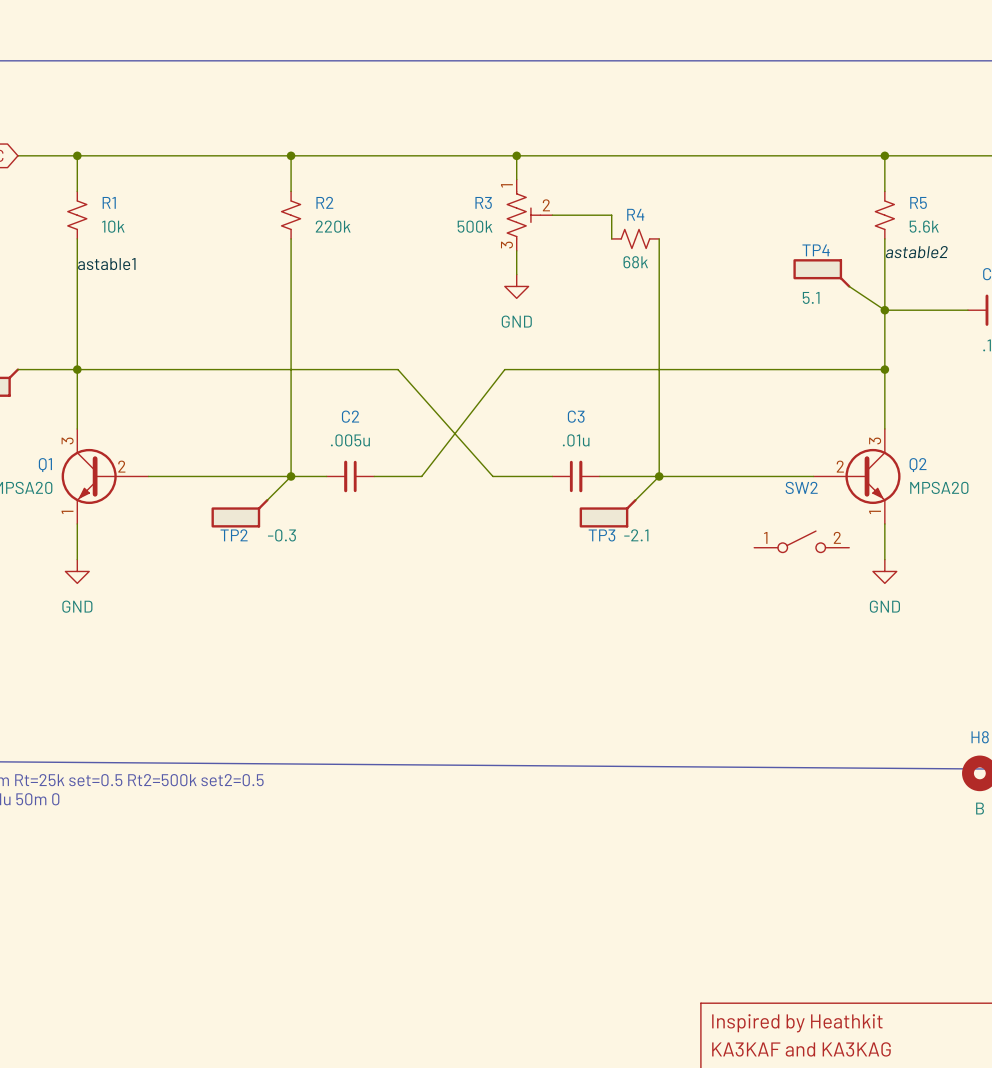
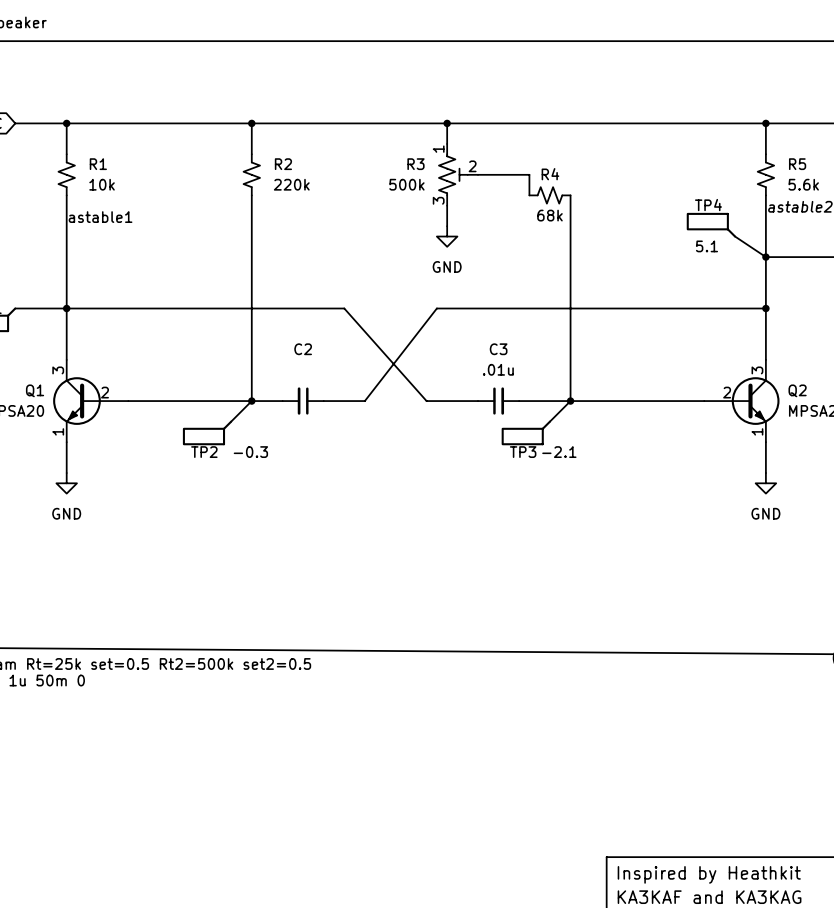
C2 value: .005u (350, 440) -> none
SW2: (801, 541) -> none

